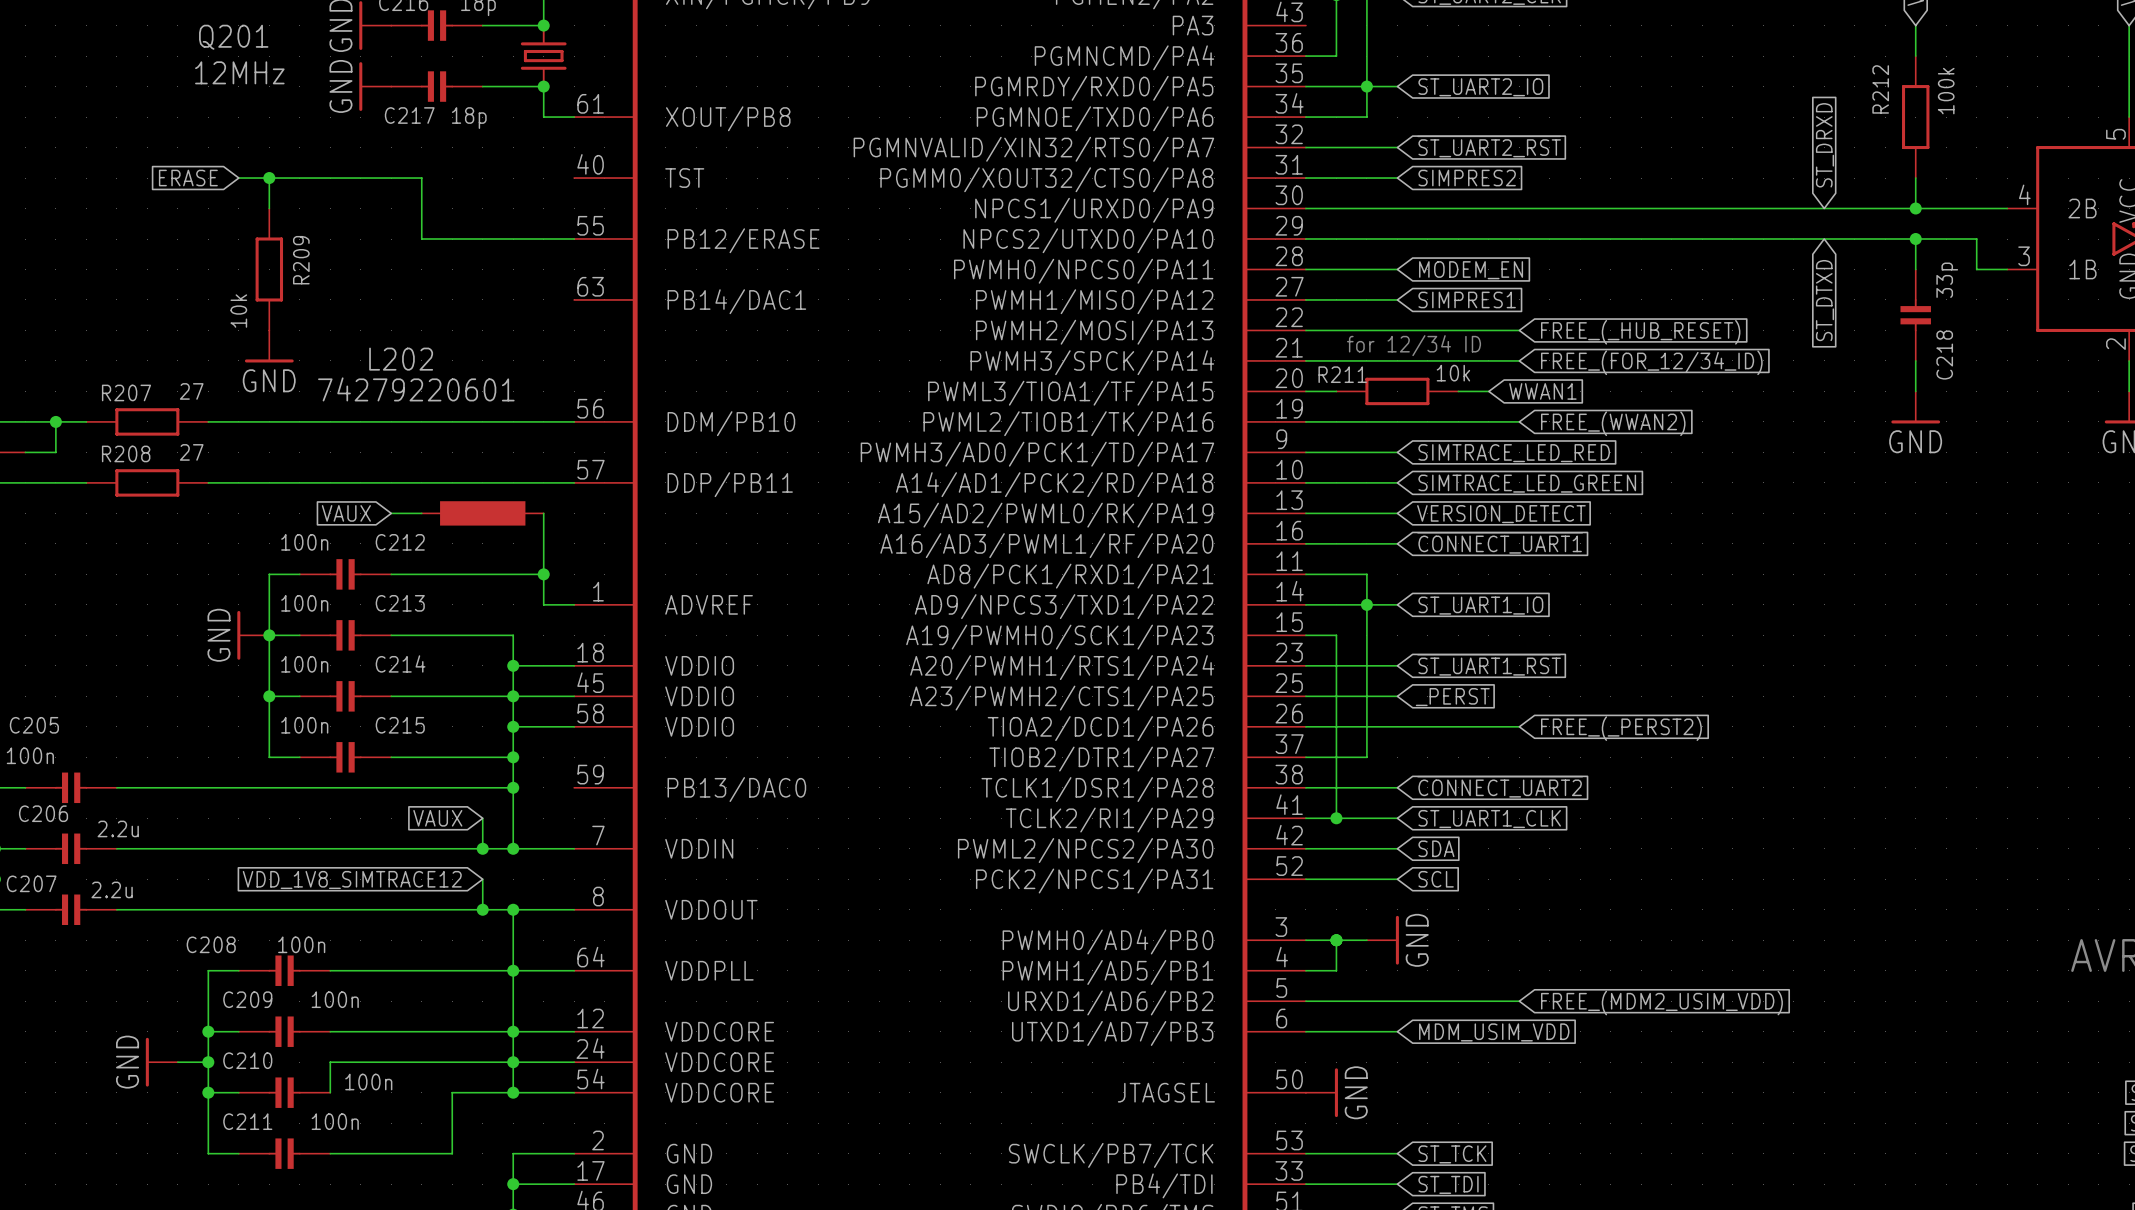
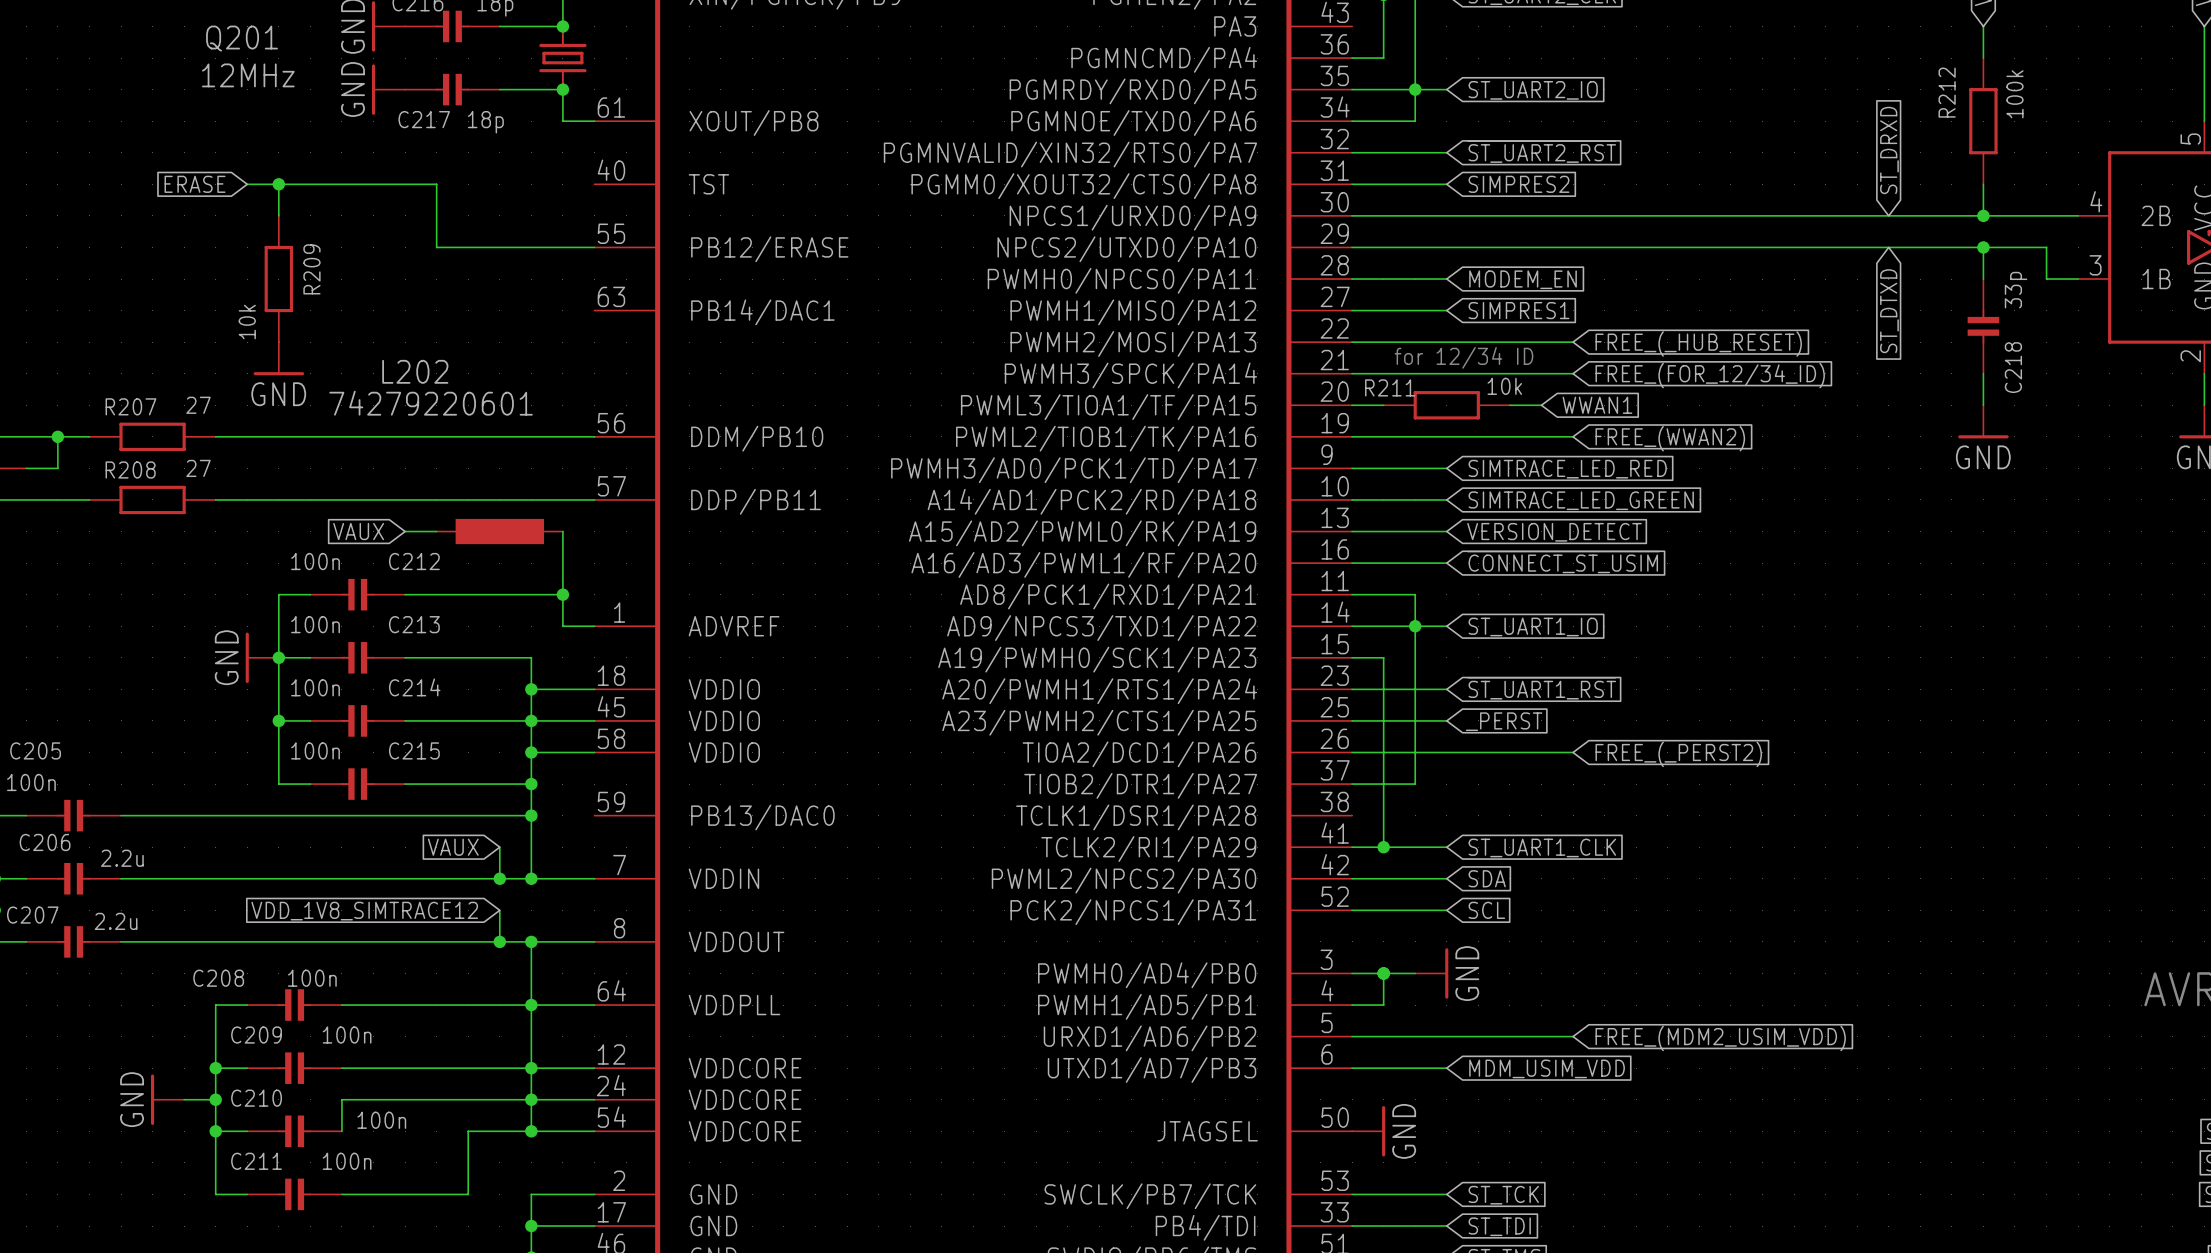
global label: ~{CONNECT_UART1} (1500, 542) -> ~{CONNECT_ST_USIM} (1563, 562)
global label: ~{CONNECT_UART2} (1500, 786) -> none
wire: (1305, 787) (1397, 787) -> none

